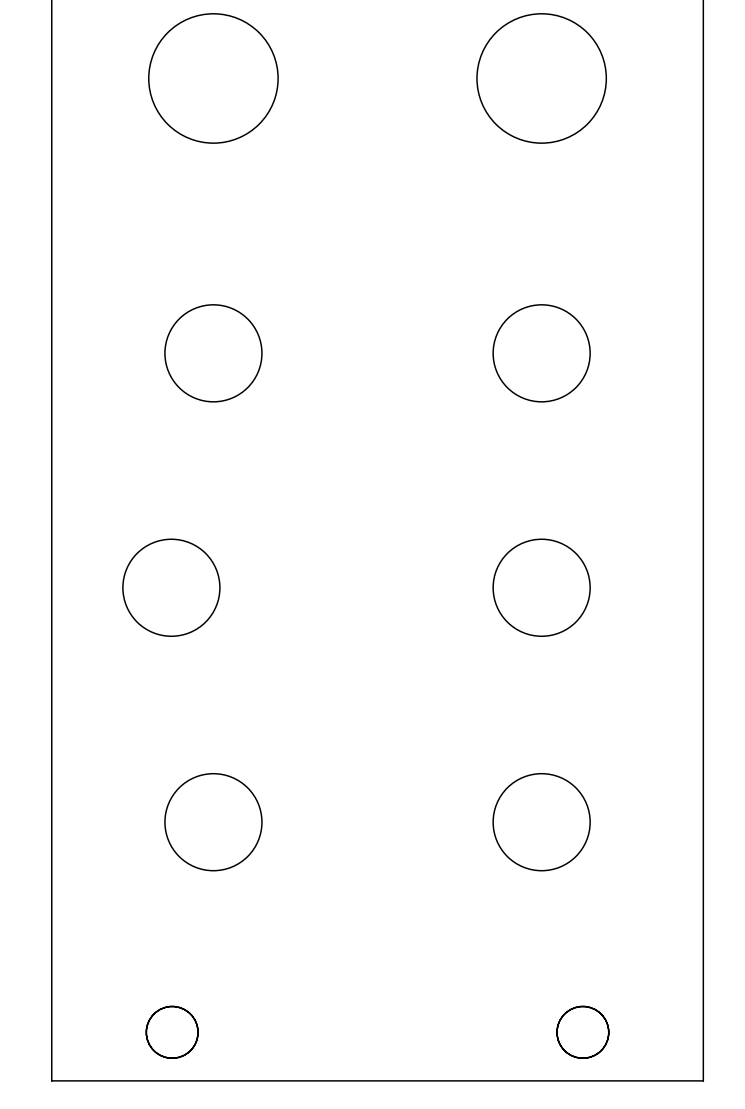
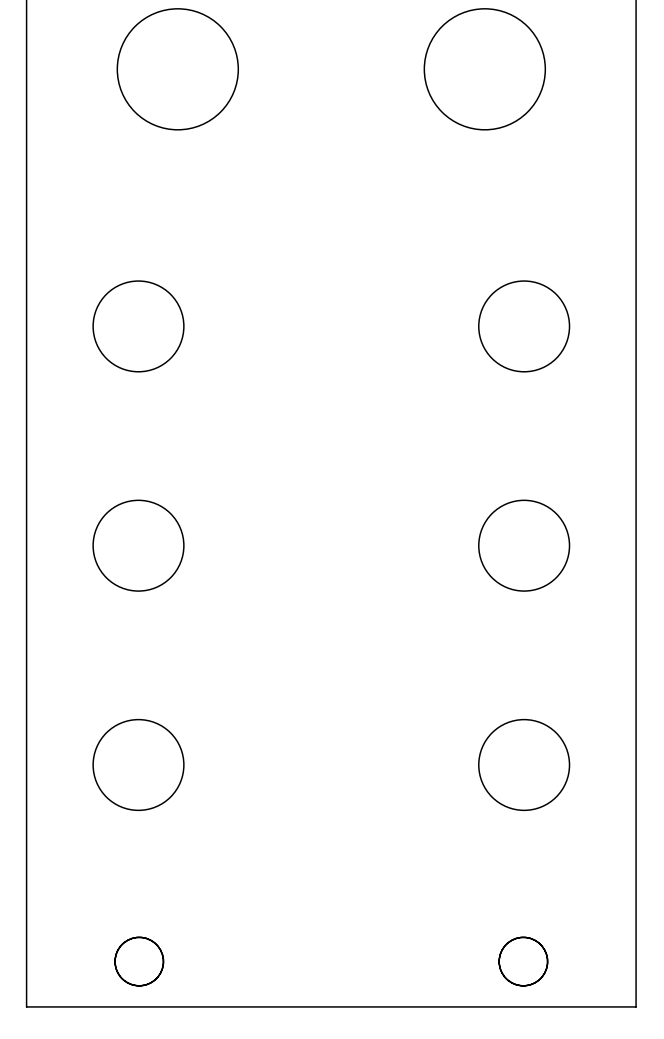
round board edge position: (213, 353) -> (138, 326)
round board edge position: (541, 353) -> (524, 326)
round board edge position: (541, 587) -> (524, 545)
round board edge position: (213, 822) -> (138, 764)
round board edge position: (541, 822) -> (524, 764)

